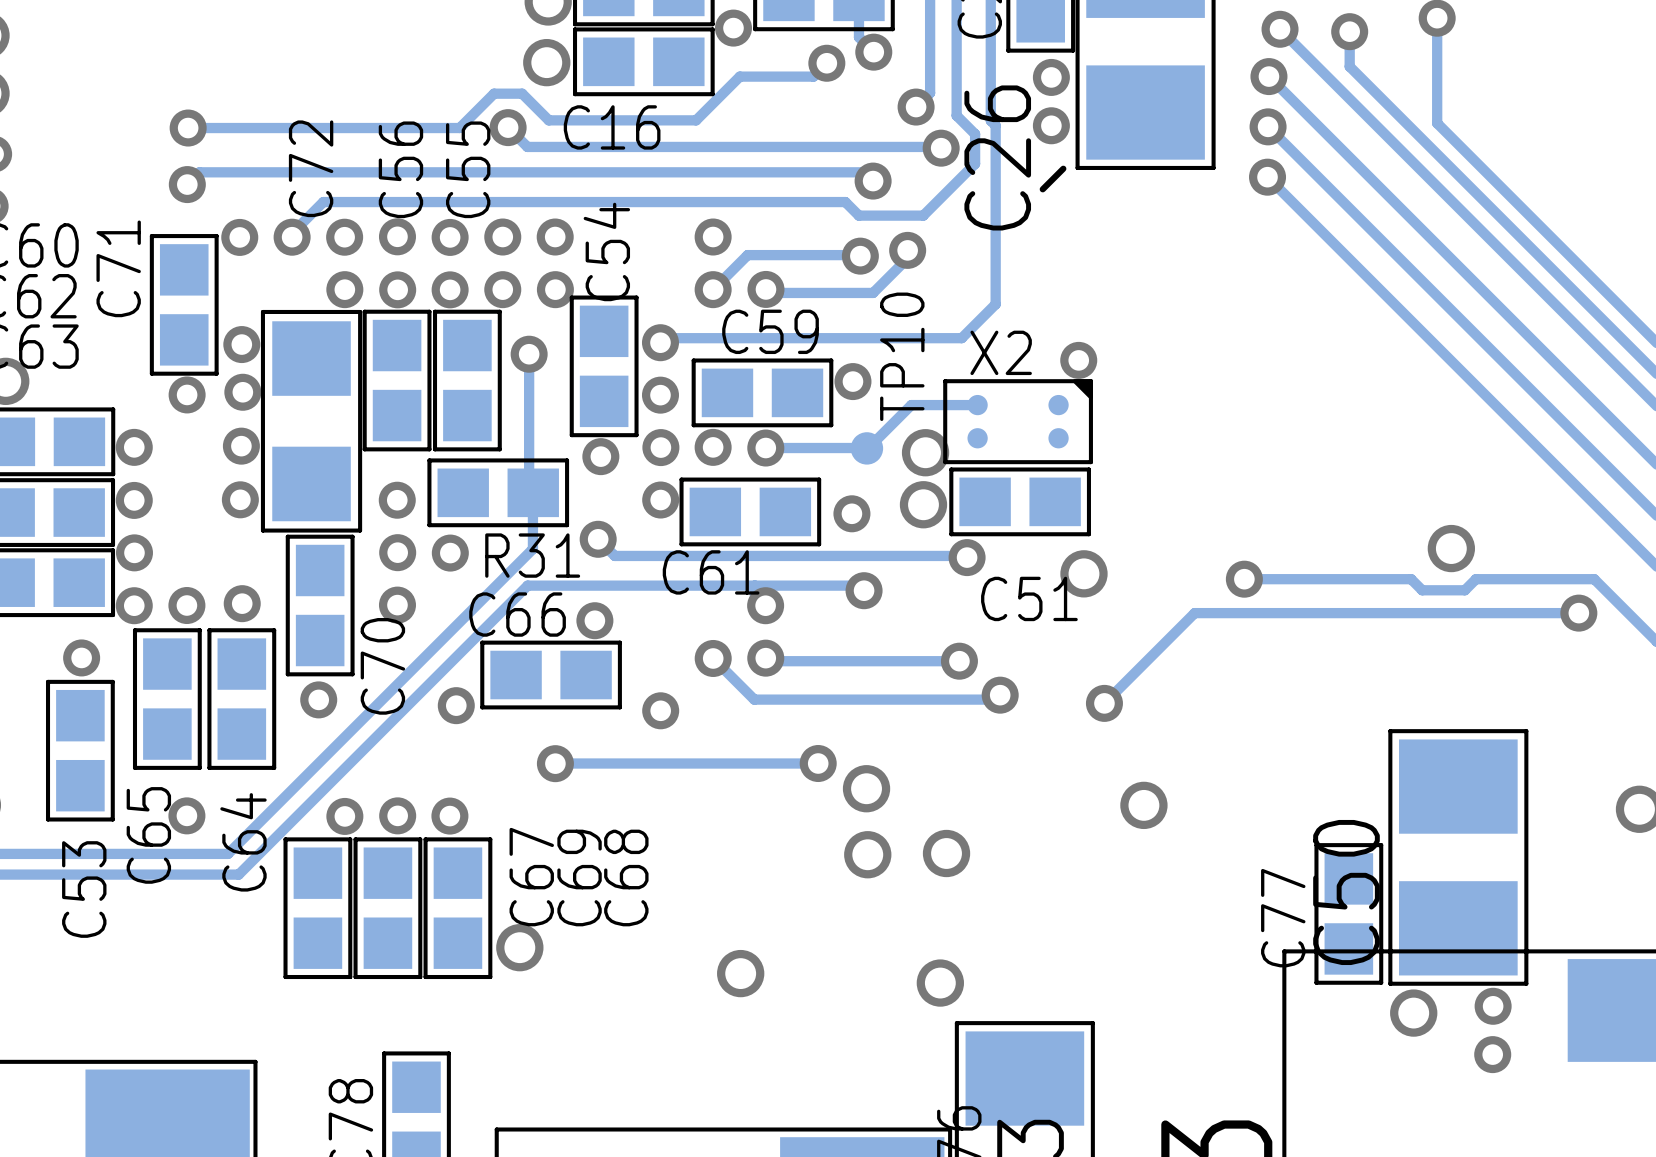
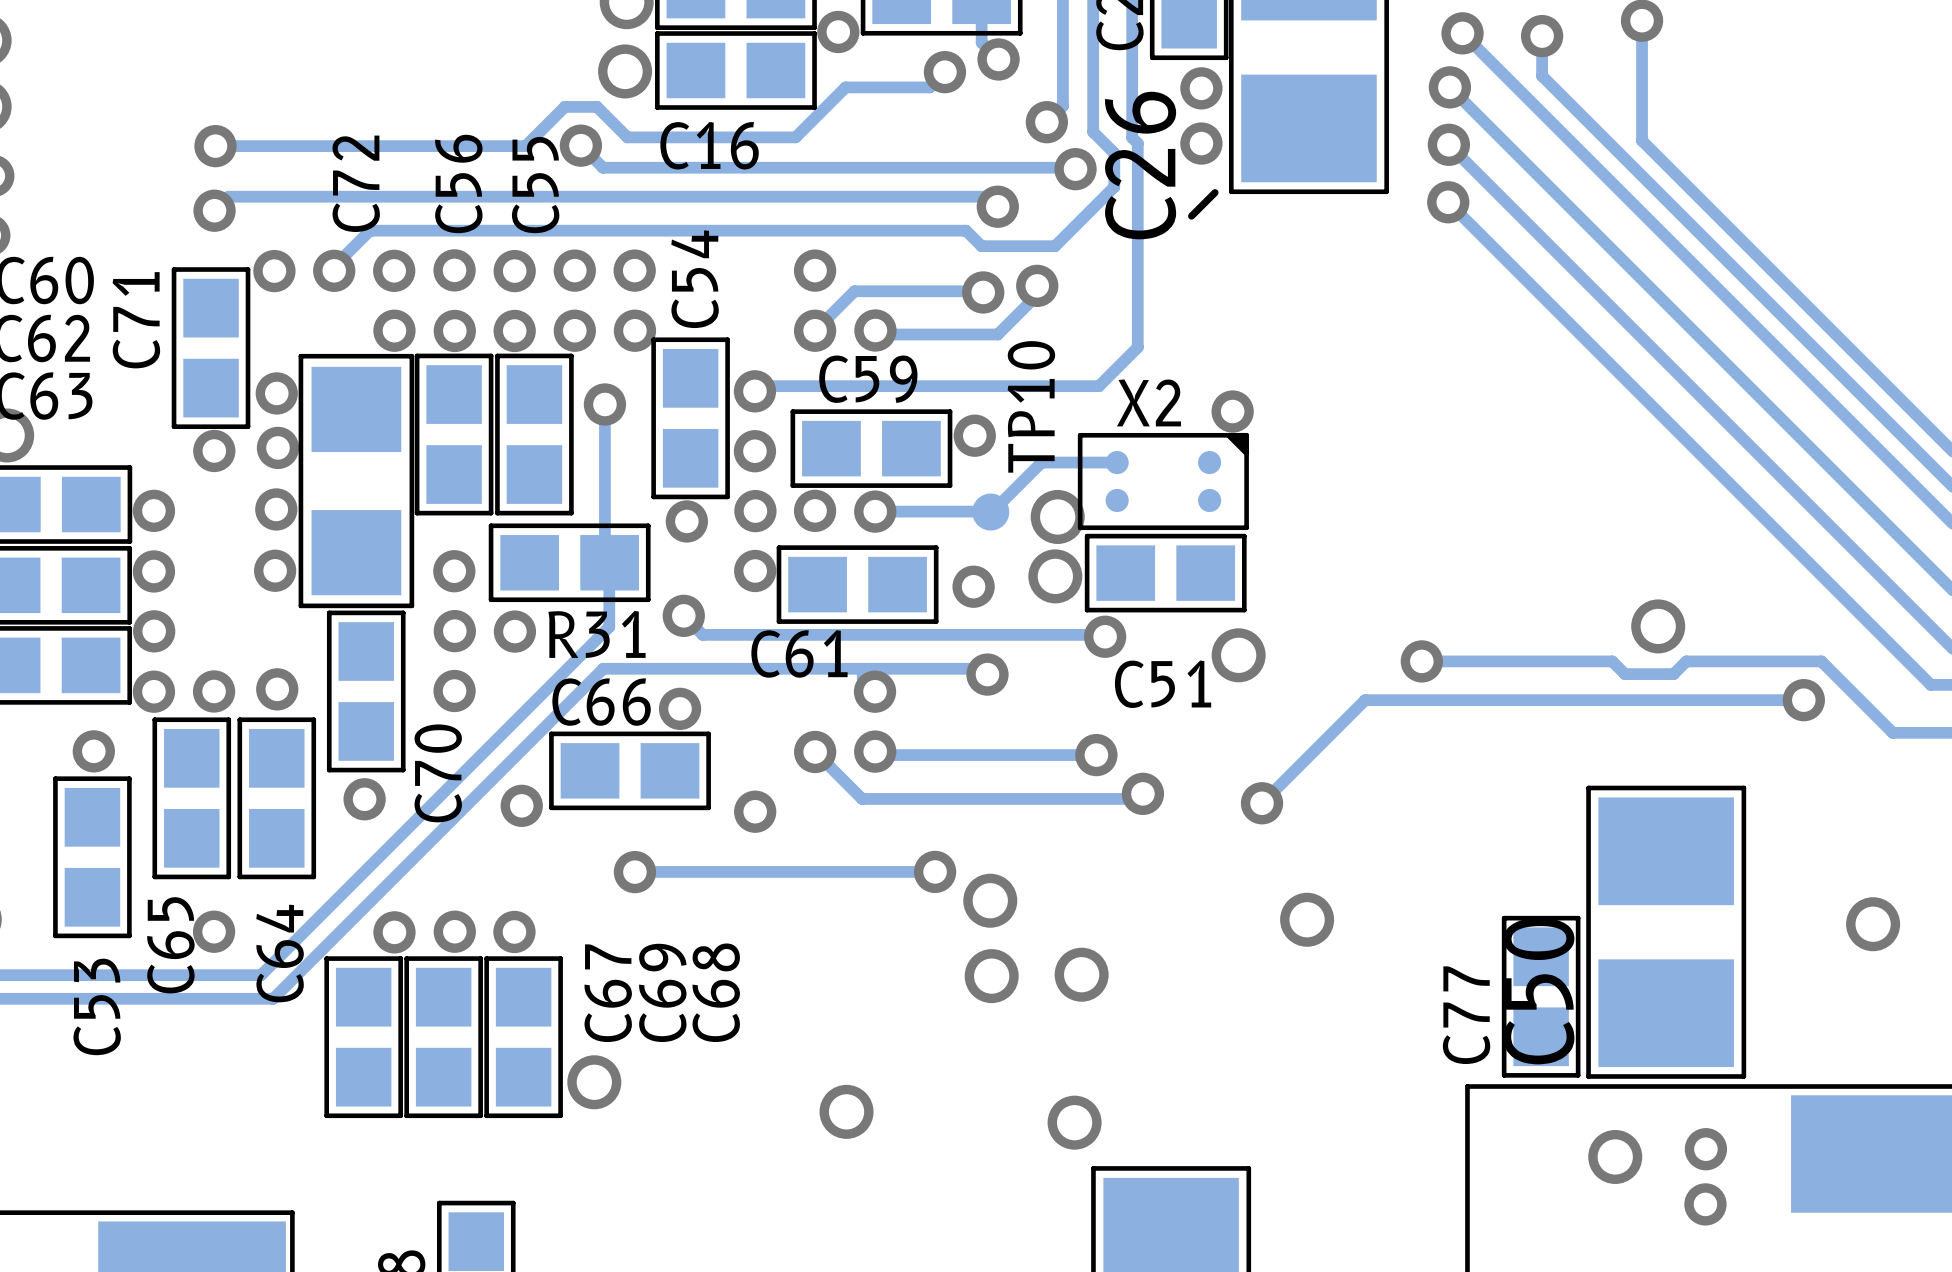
C50 position: (1458, 857) -> (1666, 932)
C77 position: (1348, 913) -> (1541, 996)

